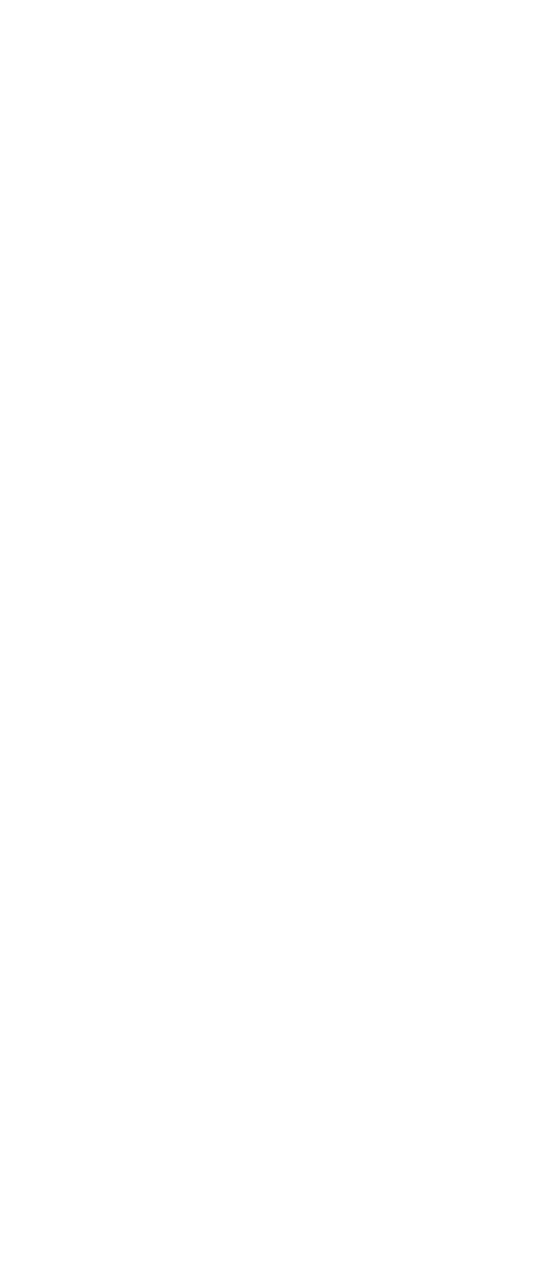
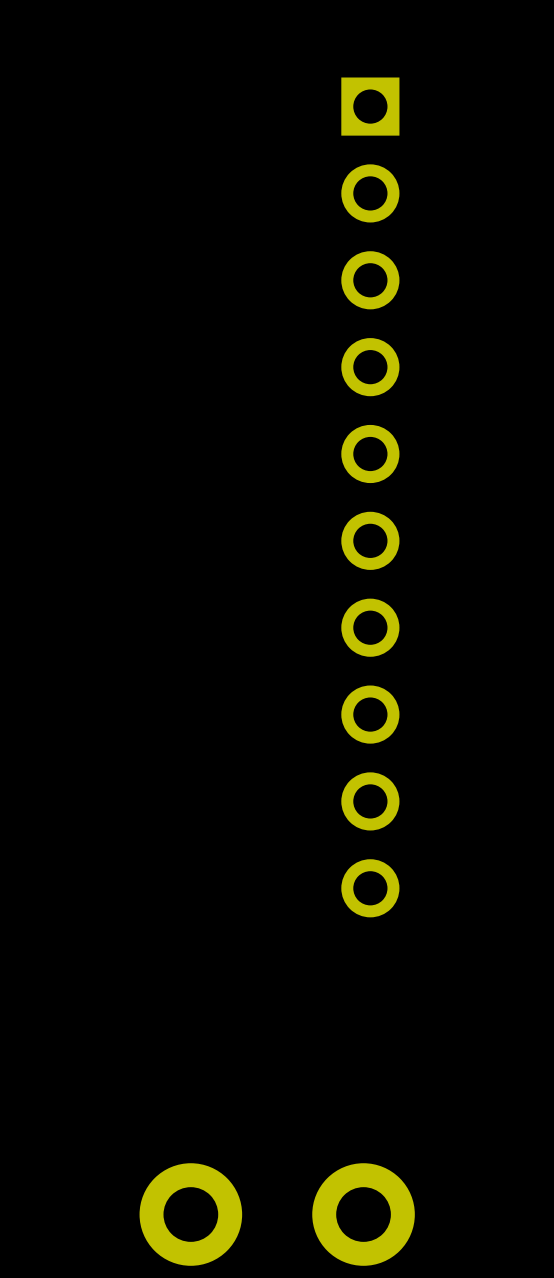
part: none -> (370, 497)
part: none -> (190, 1214)
part: none -> (363, 1214)

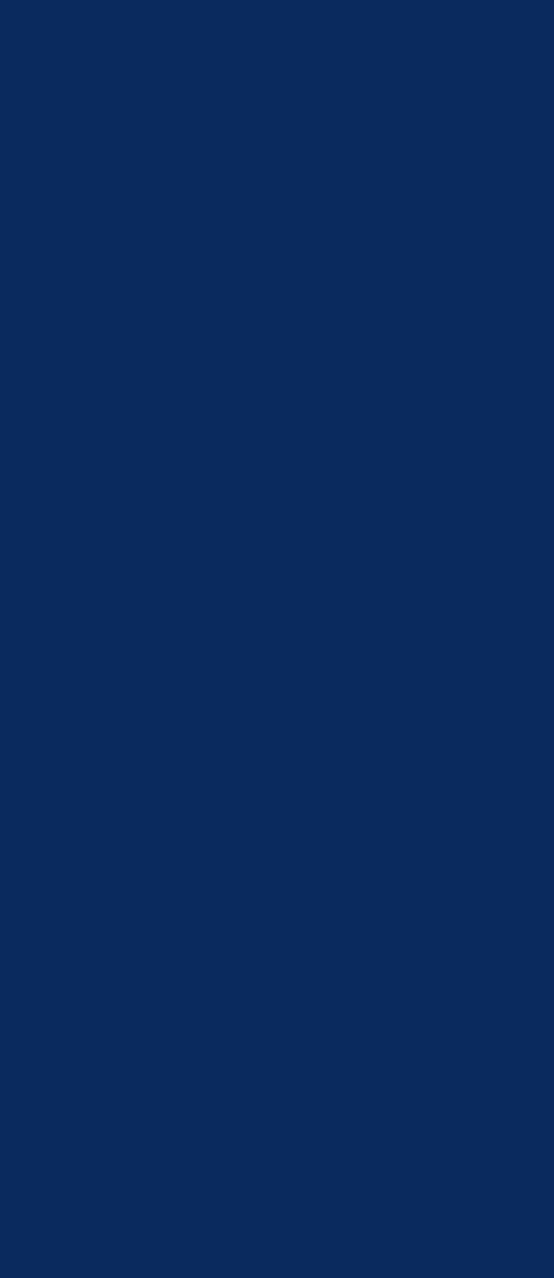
part: (370, 497) -> none
part: (190, 1214) -> none
part: (363, 1214) -> none

